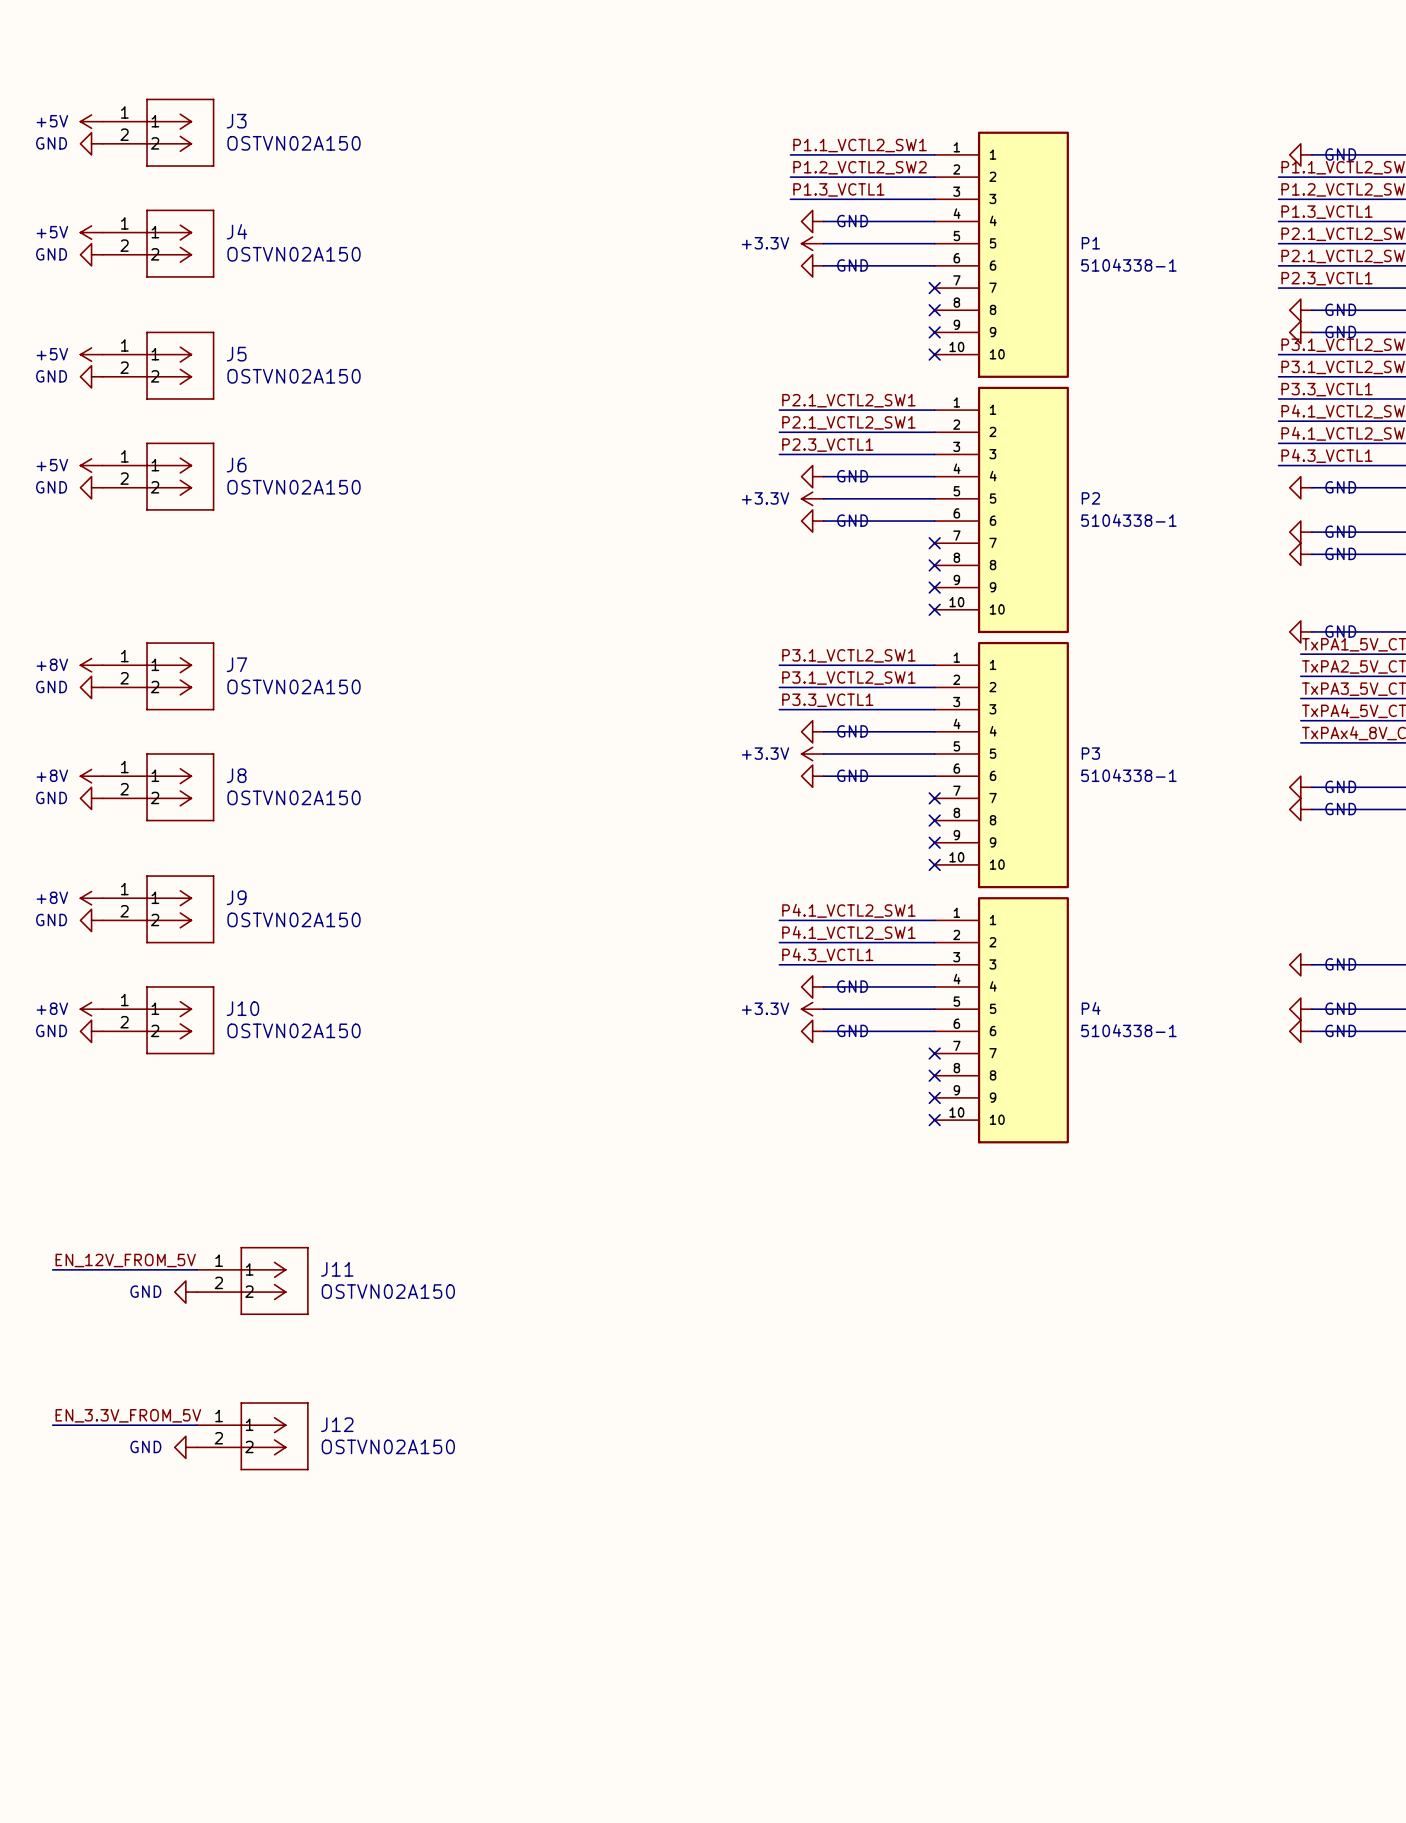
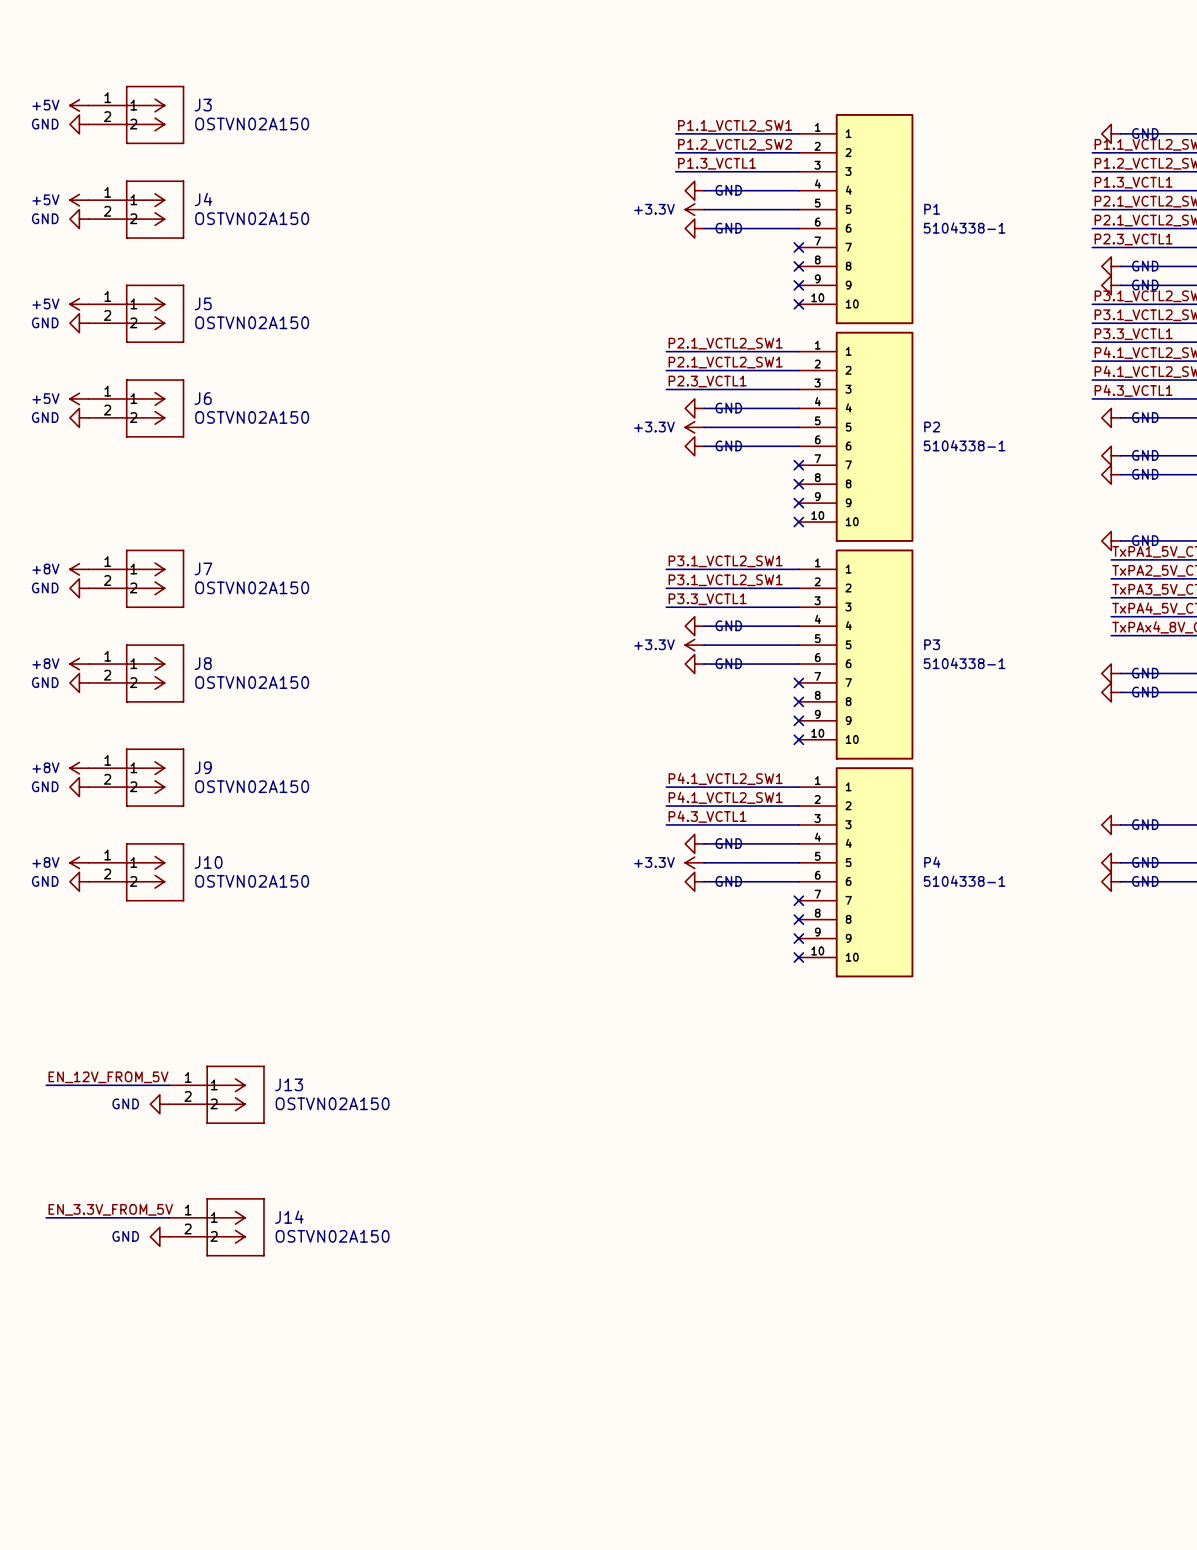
J11 name: J11 (337, 1269) -> J13 (289, 1084)
J12 name: J12 (337, 1424) -> J14 (289, 1217)

